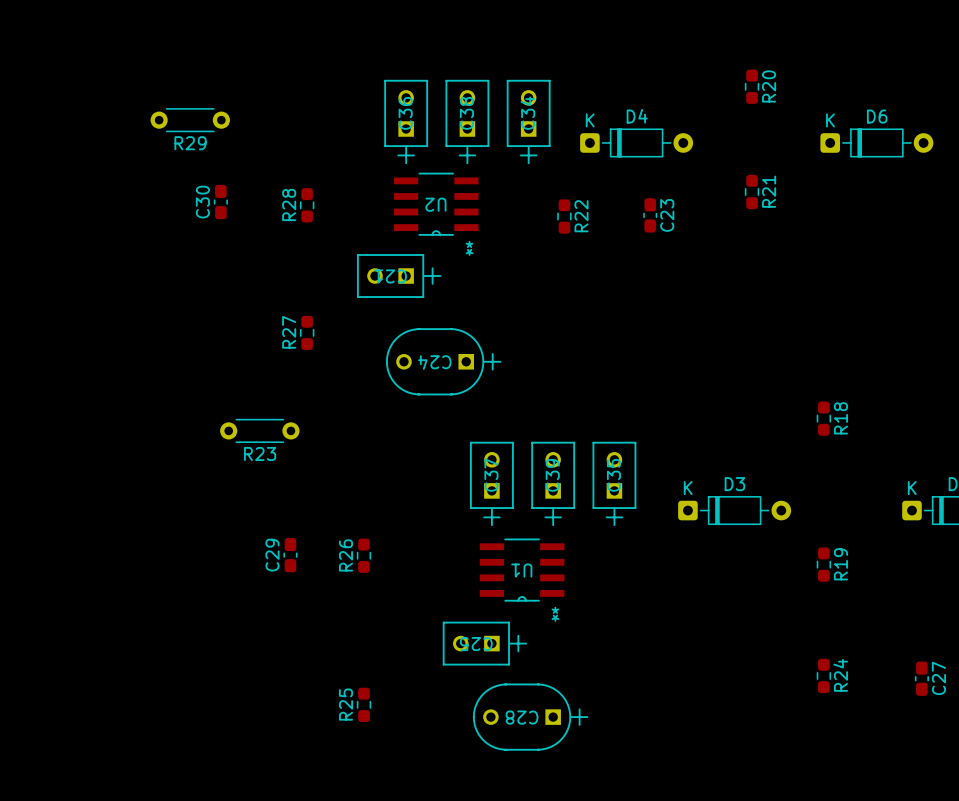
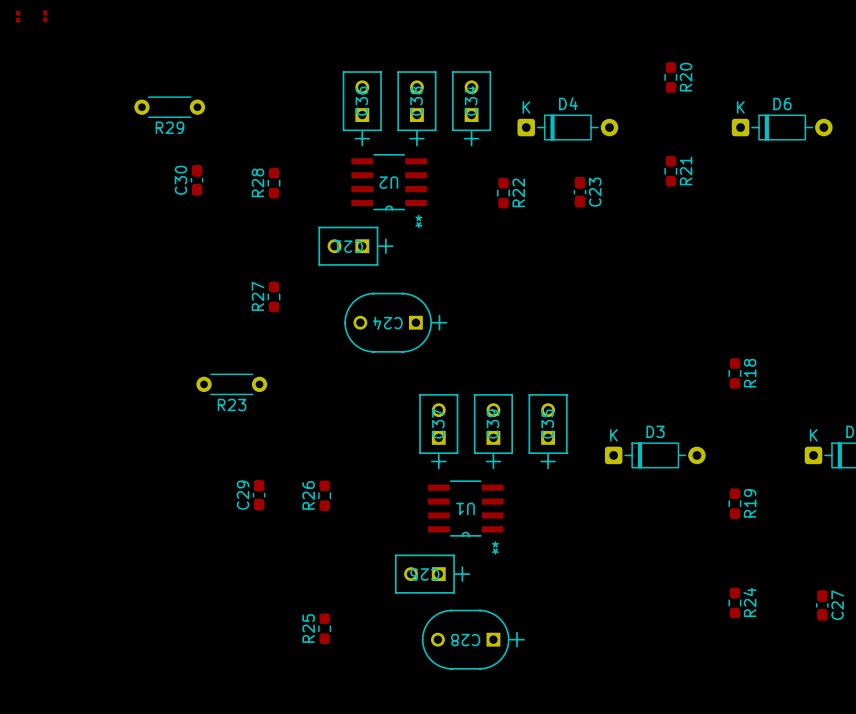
part: none -> (18, 16)
part: none -> (45, 16)

